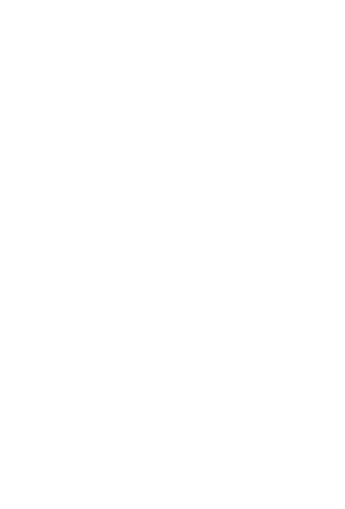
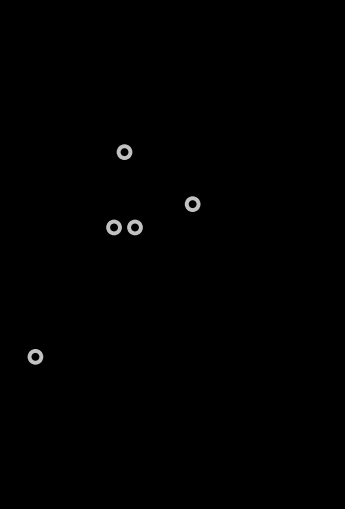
via: none -> (124, 152)
via: none -> (192, 204)
via: none -> (114, 227)
via: none -> (134, 227)
via: none -> (35, 356)

